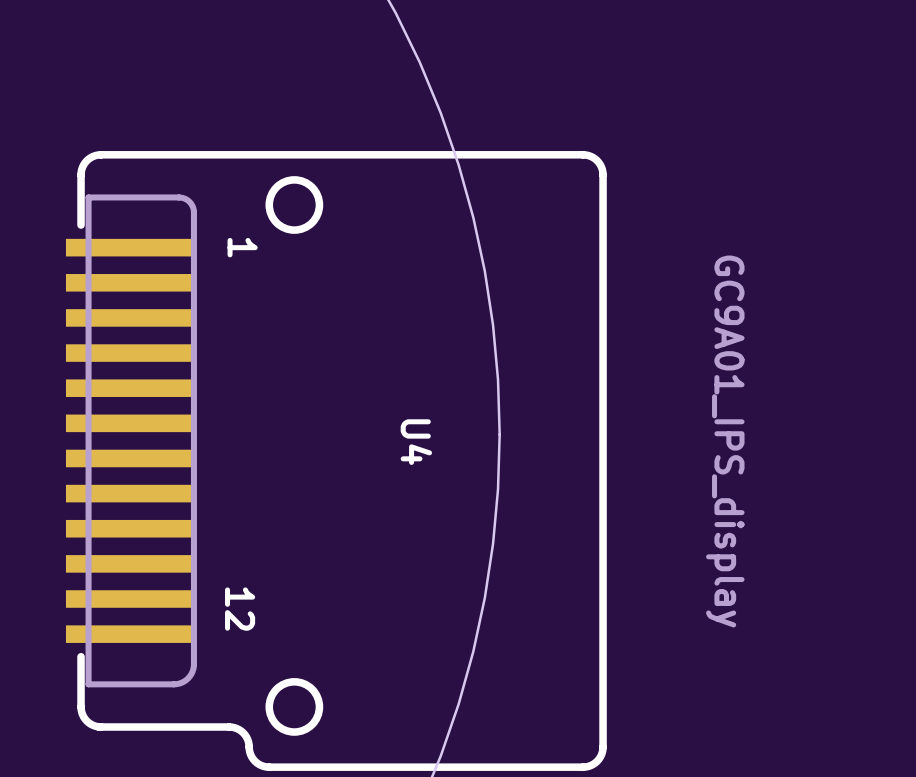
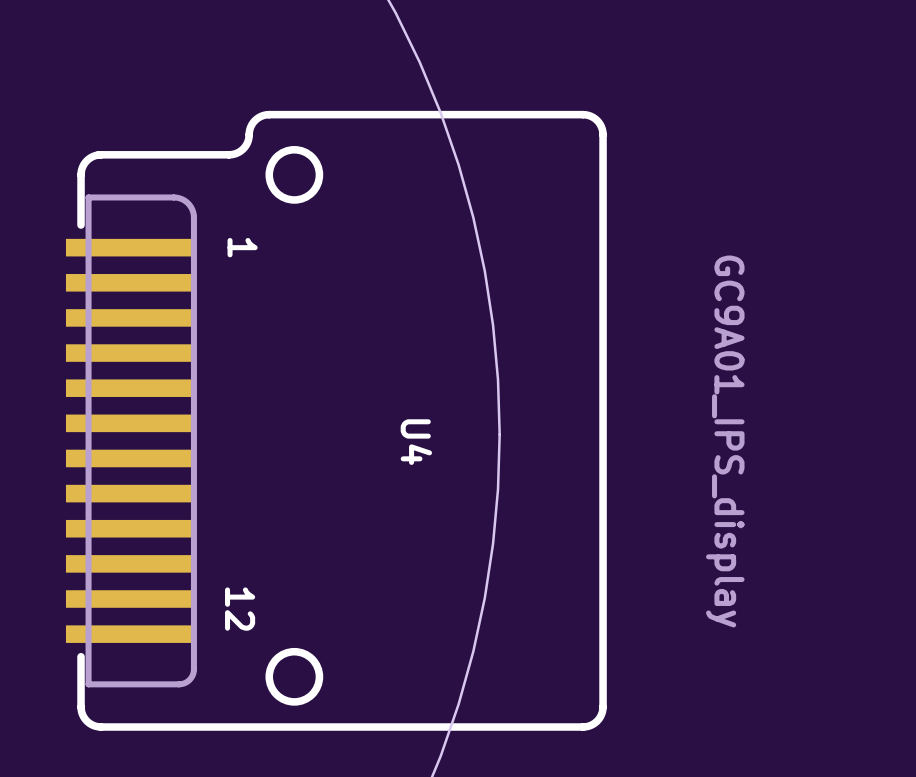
U4 footprint: [65, 151, 607, 771] -> [65, 110, 607, 731]

